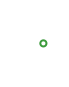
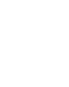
via: (43, 43) -> none

